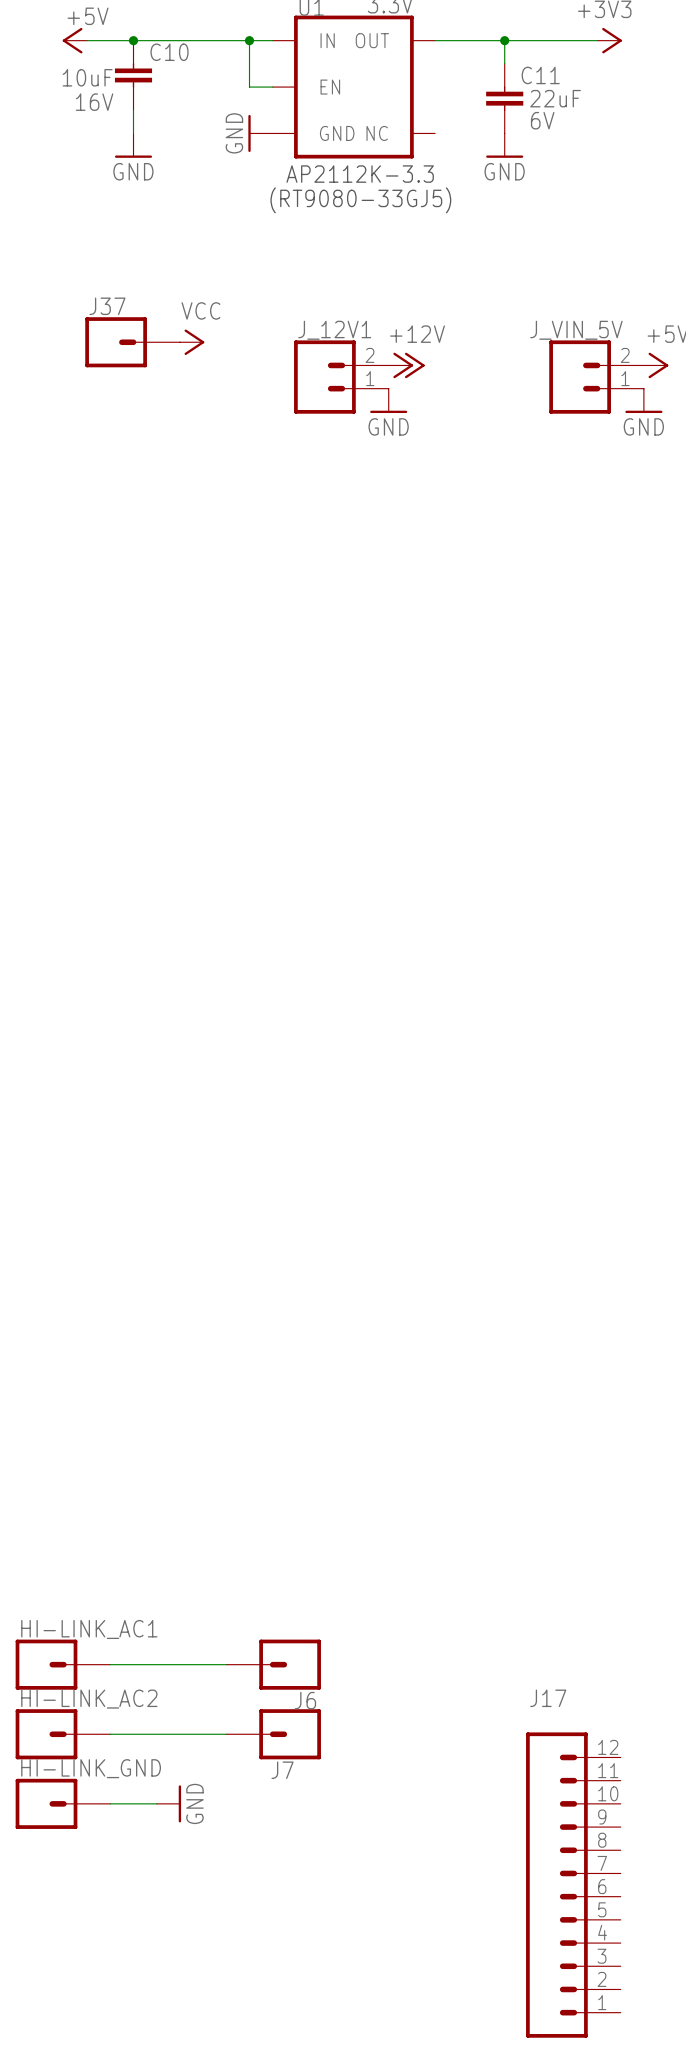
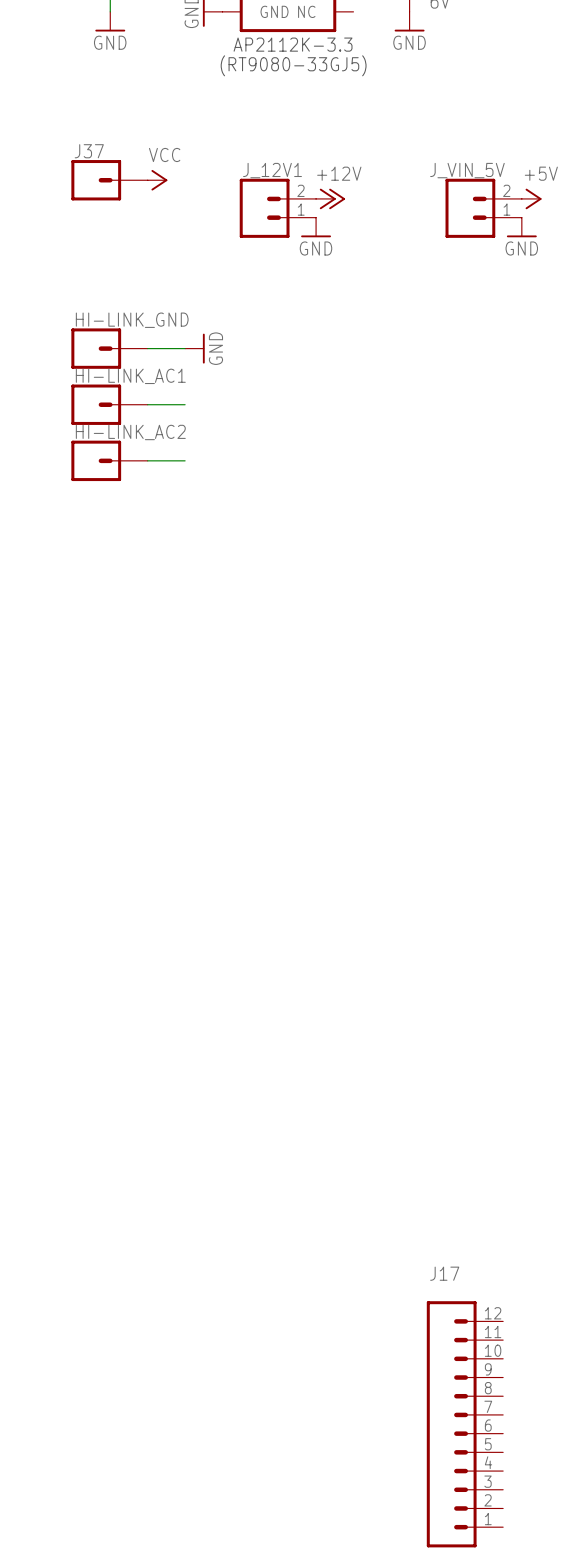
HI-LINK_GND: none -> (109, 348)
wire: none -> (147, 348) (185, 348)
power symbol: none -> GND (194, 348)
wire: none -> (147, 404) (185, 404)
wire: none -> (147, 460) (185, 460)
HI-LINK_AC1 position: (62, 1664) -> (109, 404)
wire: (110, 1664) (226, 1664) -> none
J6: (273, 1664) -> none
HI-LINK_AC2 position: (62, 1734) -> (109, 460)
wire: (110, 1734) (226, 1734) -> none
J7: (273, 1734) -> none
HI-LINK_GND: (62, 1803) -> none
wire: (110, 1803) (156, 1803) -> none
power symbol: GND (168, 1803) -> none

